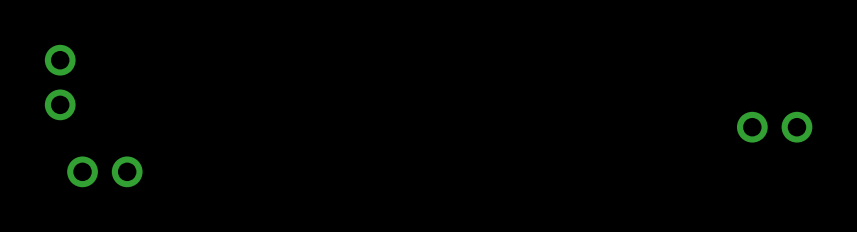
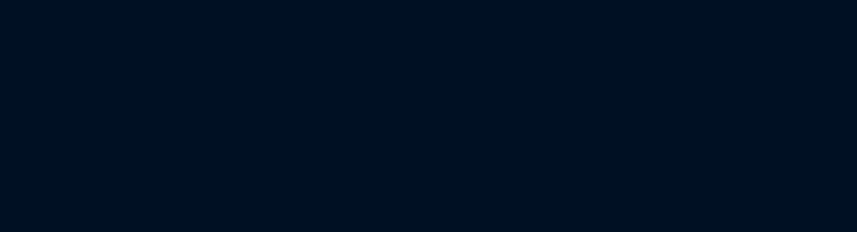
part: (60, 82) -> none
part: (774, 127) -> none
part: (104, 171) -> none

